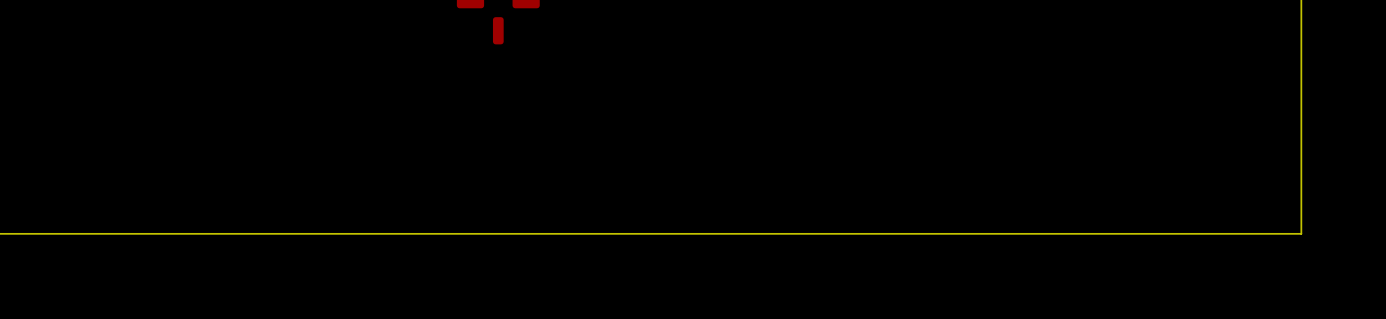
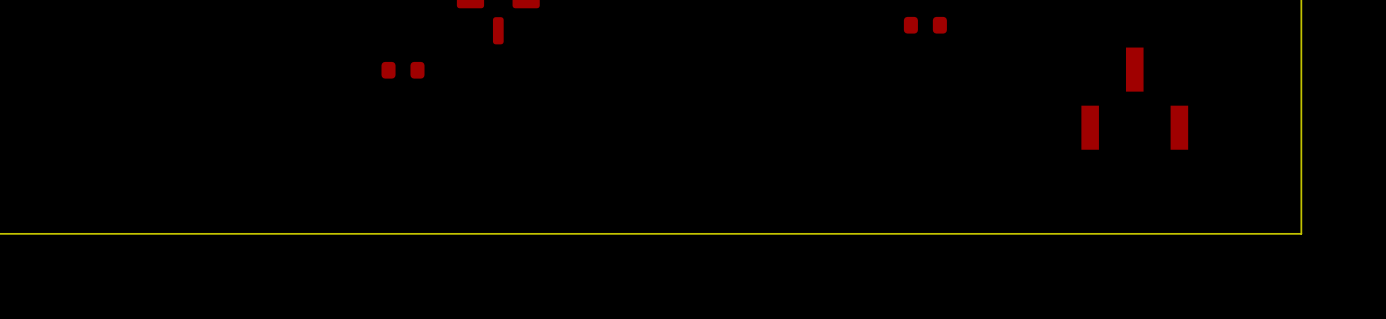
part: none -> (925, 25)
part: none -> (403, 70)
part: none -> (1134, 98)

